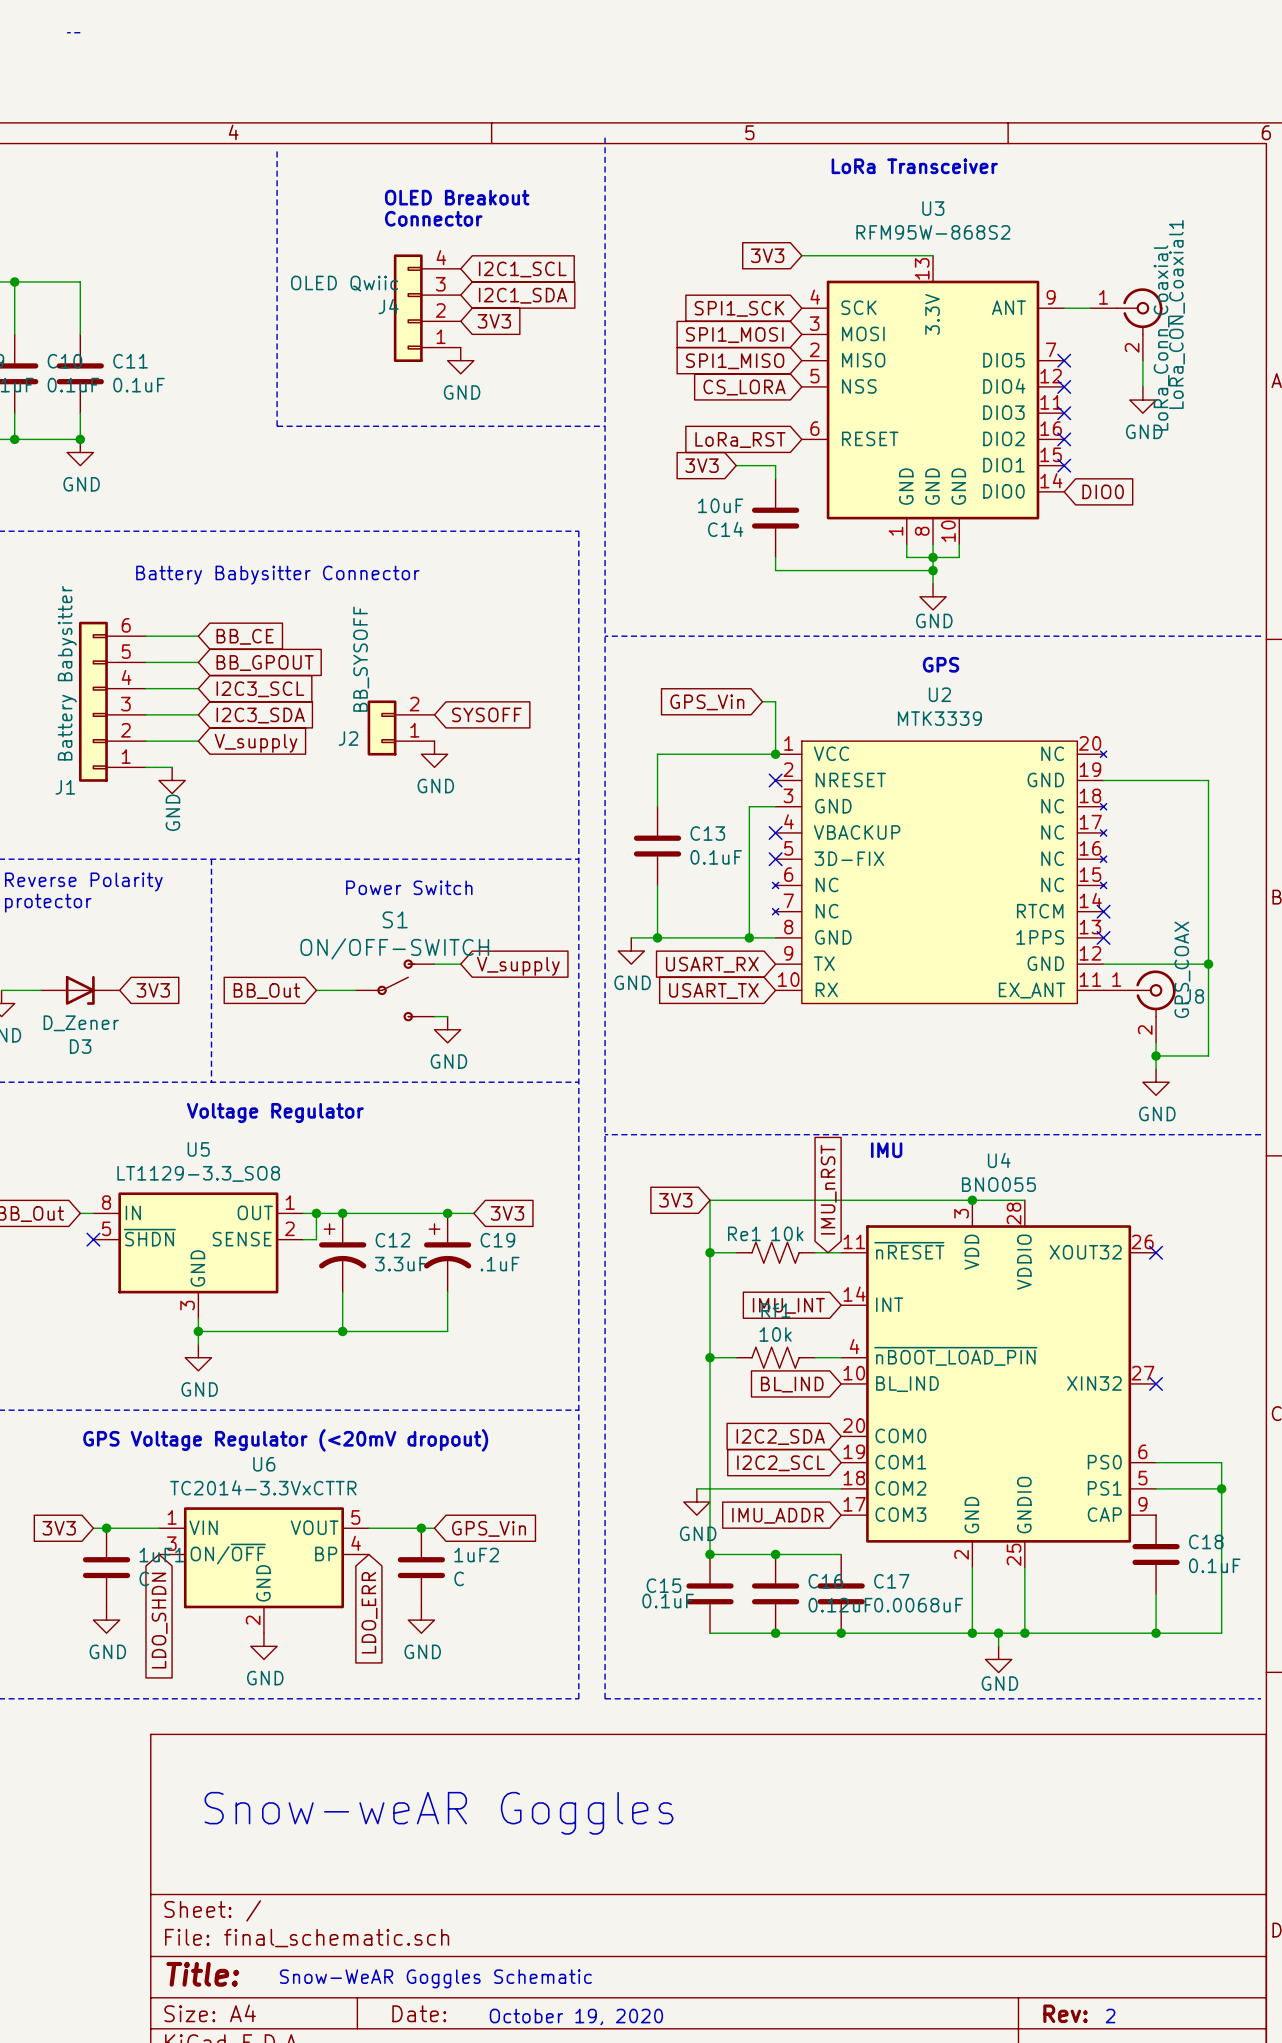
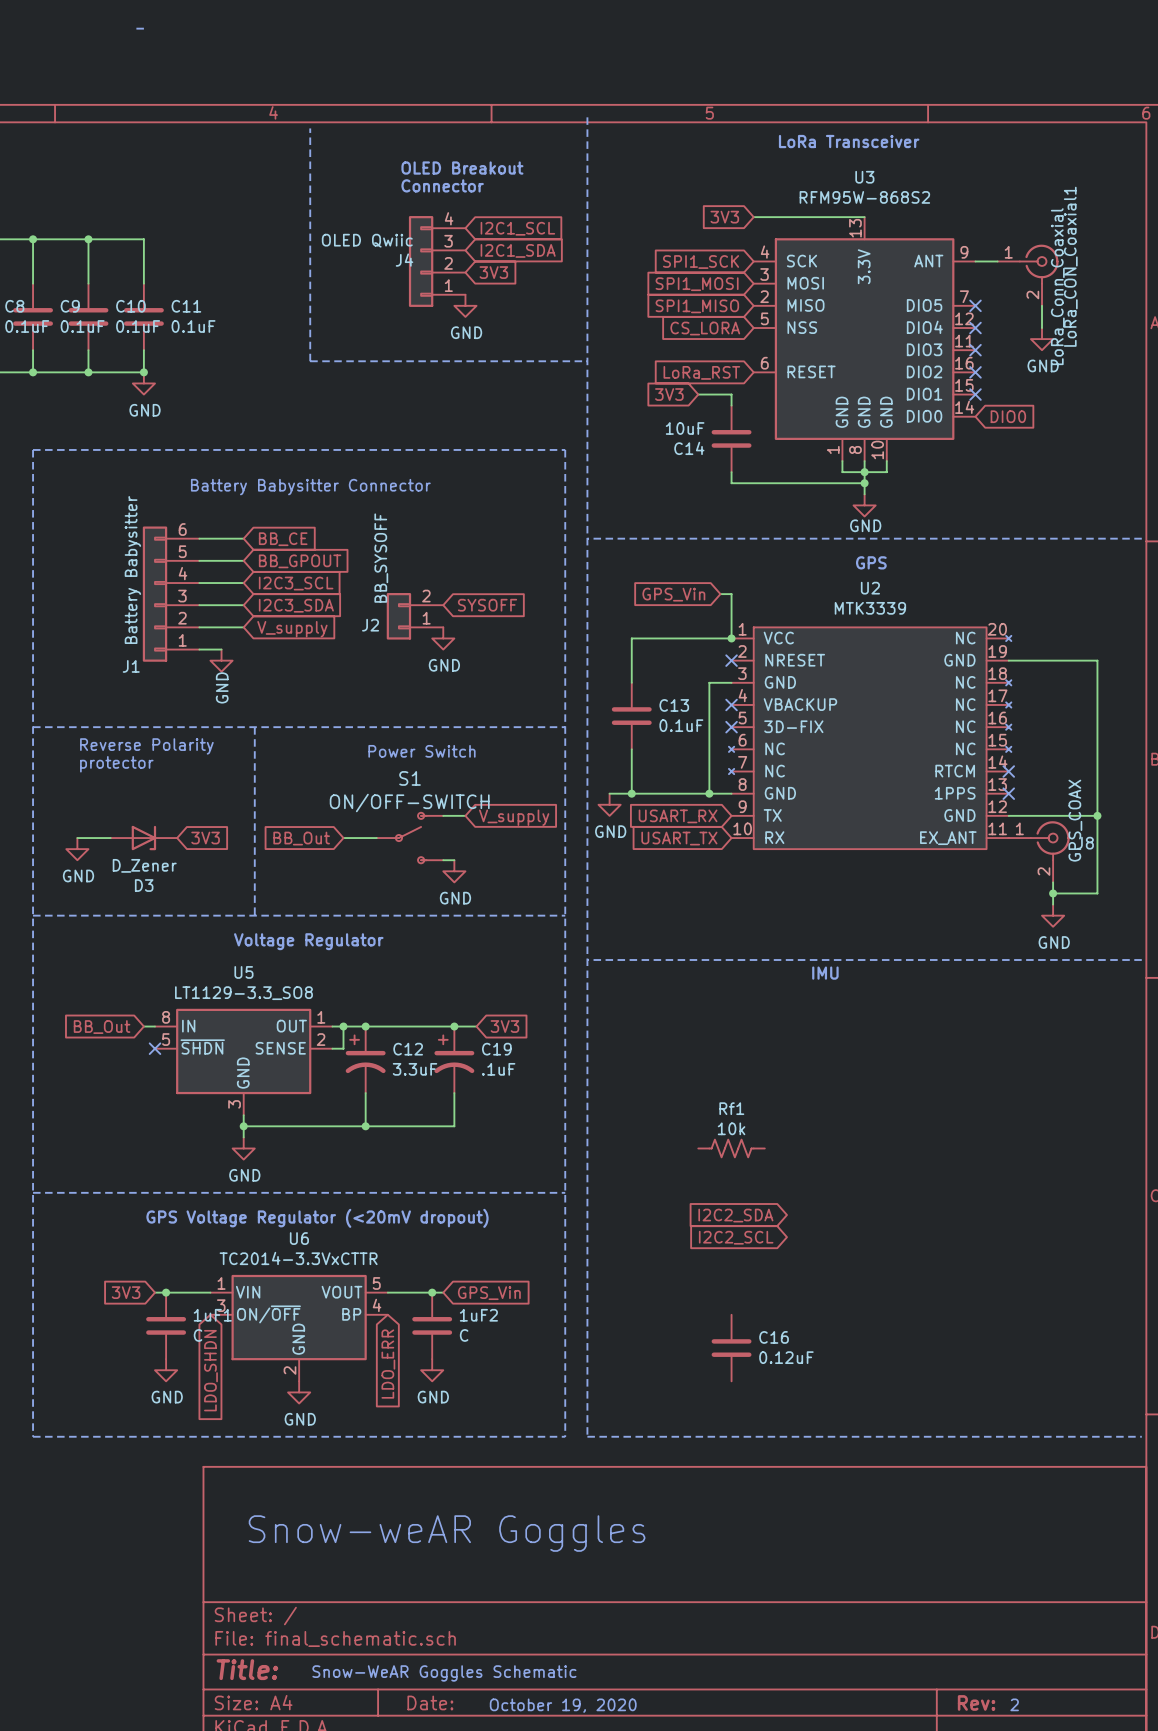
global label: IMU_nRST (828, 1189) -> none
global label: 3V3 (675, 1200) -> none
junction: (972, 1200) -> none
wire: (1024, 1200) (710, 1200) (710, 1554) (841, 1554) -> none
wire: (710, 1252) (736, 1252) -> none
junction: (710, 1252) -> none
Re1: 10k (775, 1252) -> none
wire: (814, 1252) (841, 1252) -> none
no-connect mark: (1156, 1252) -> none
global label: IMU_INT (788, 1305) -> none
wire: (710, 1357) (736, 1357) -> none
junction: (710, 1357) -> none
wire: (814, 1357) (841, 1357) -> none
U4: BNO055 (998, 1383) -> none
no-connect mark: (1156, 1383) -> none
global label: BL_IND (792, 1384) -> none
wire: (1156, 1462) (1221, 1462) (1221, 1633) (710, 1633) -> none
wire: (696, 1488) (841, 1488) -> none
wire: (1156, 1488) (1221, 1488) -> none
junction: (1221, 1488) -> none
power symbol: GND (696, 1502) -> none
global label: IMU_ADDR (777, 1515) -> none
junction: (710, 1554) -> none
junction: (775, 1554) -> none
C18: 0.1uF (1156, 1554) -> none
wire: (972, 1567) (972, 1633) -> none
wire: (1024, 1567) (1024, 1633) -> none
C15: 0.1uF (710, 1593) -> none
C17: 0.0068uF (841, 1593) -> none
wire: (1156, 1593) (1156, 1633) -> none
junction: (775, 1633) -> none
junction: (841, 1633) -> none
junction: (972, 1633) -> none
wire: (998, 1633) (998, 1646) -> none
junction: (998, 1633) -> none
junction: (1024, 1633) -> none
junction: (1156, 1633) -> none
power symbol: GND (998, 1659) -> none

